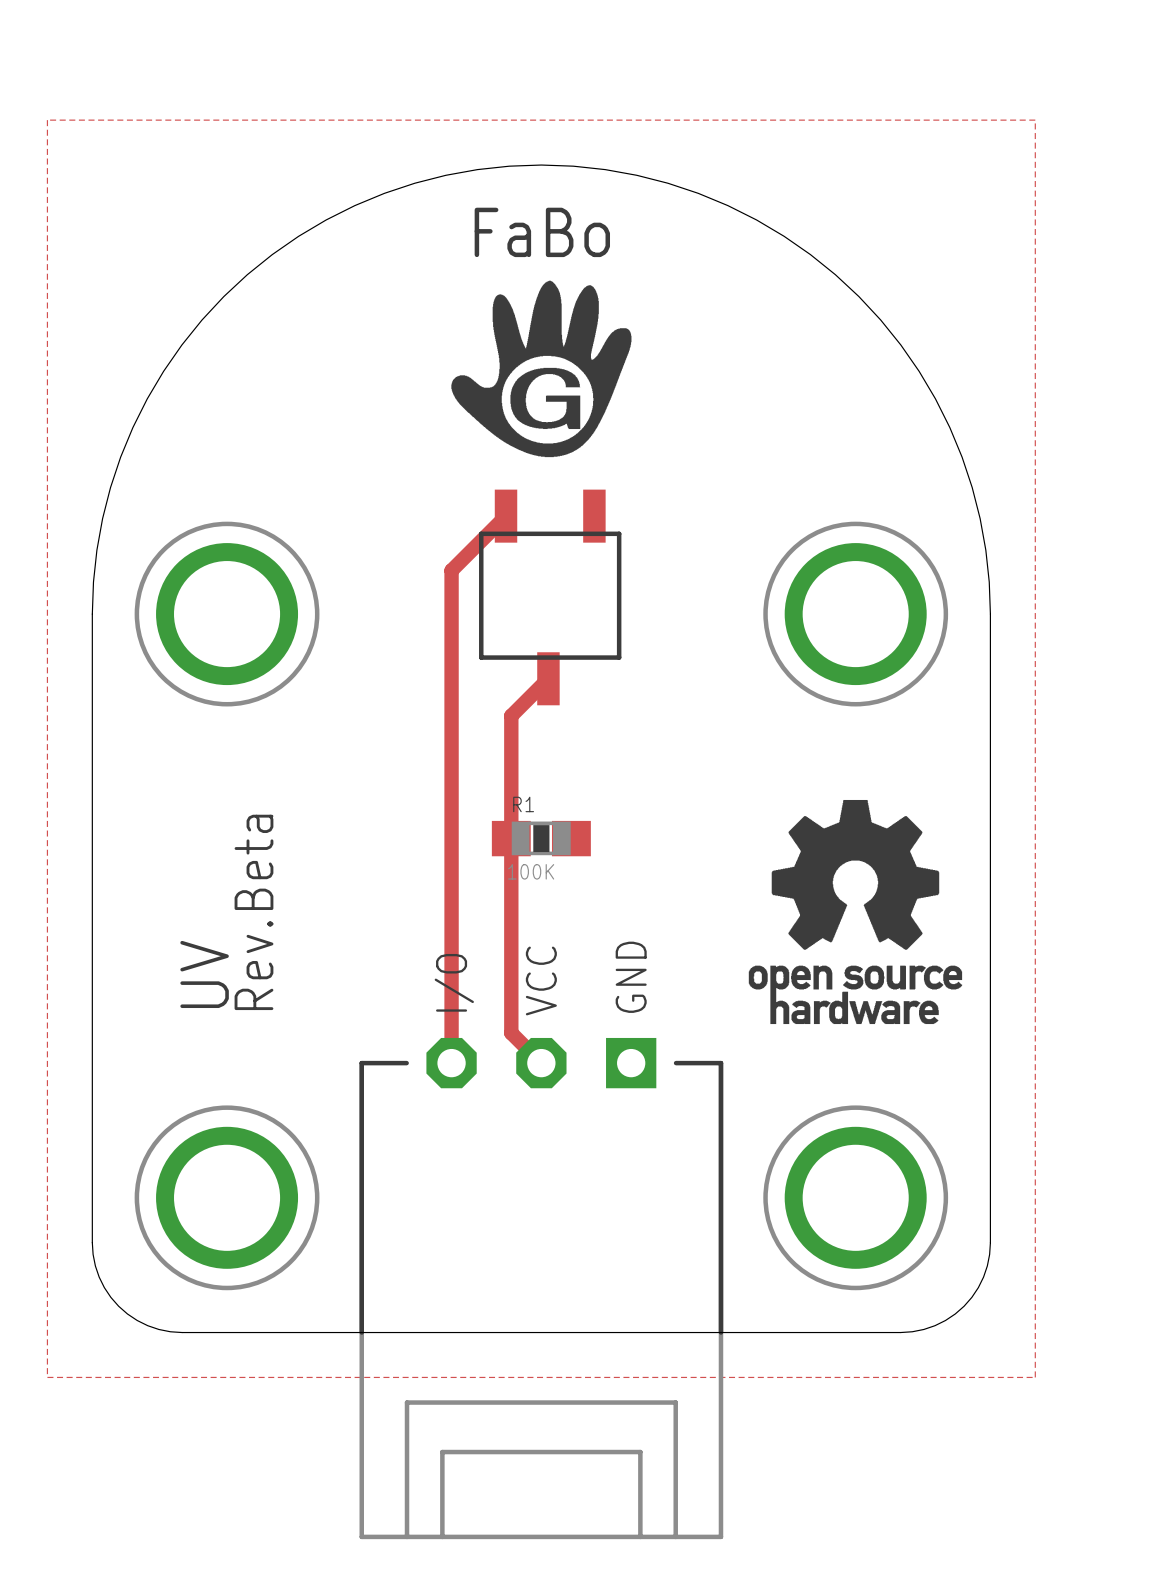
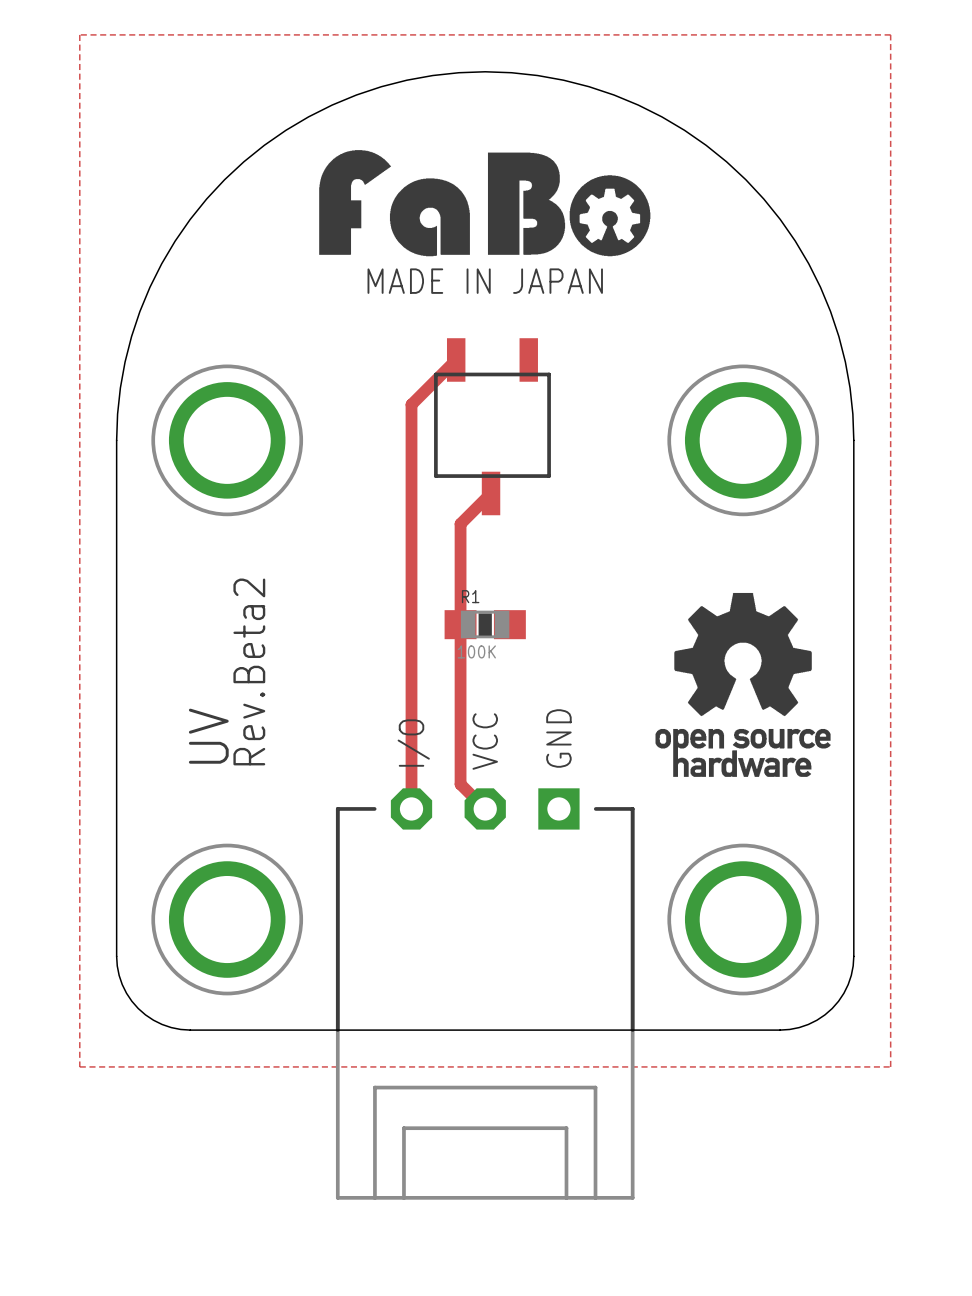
drawing: none -> [319, 150, 651, 257]
drawing: [451, 280, 632, 458] -> none
text: none -> MADE IN JAPAN (485, 281)
text: Rev.Beta (253, 912) -> Rev.Beta2 (249, 671)

